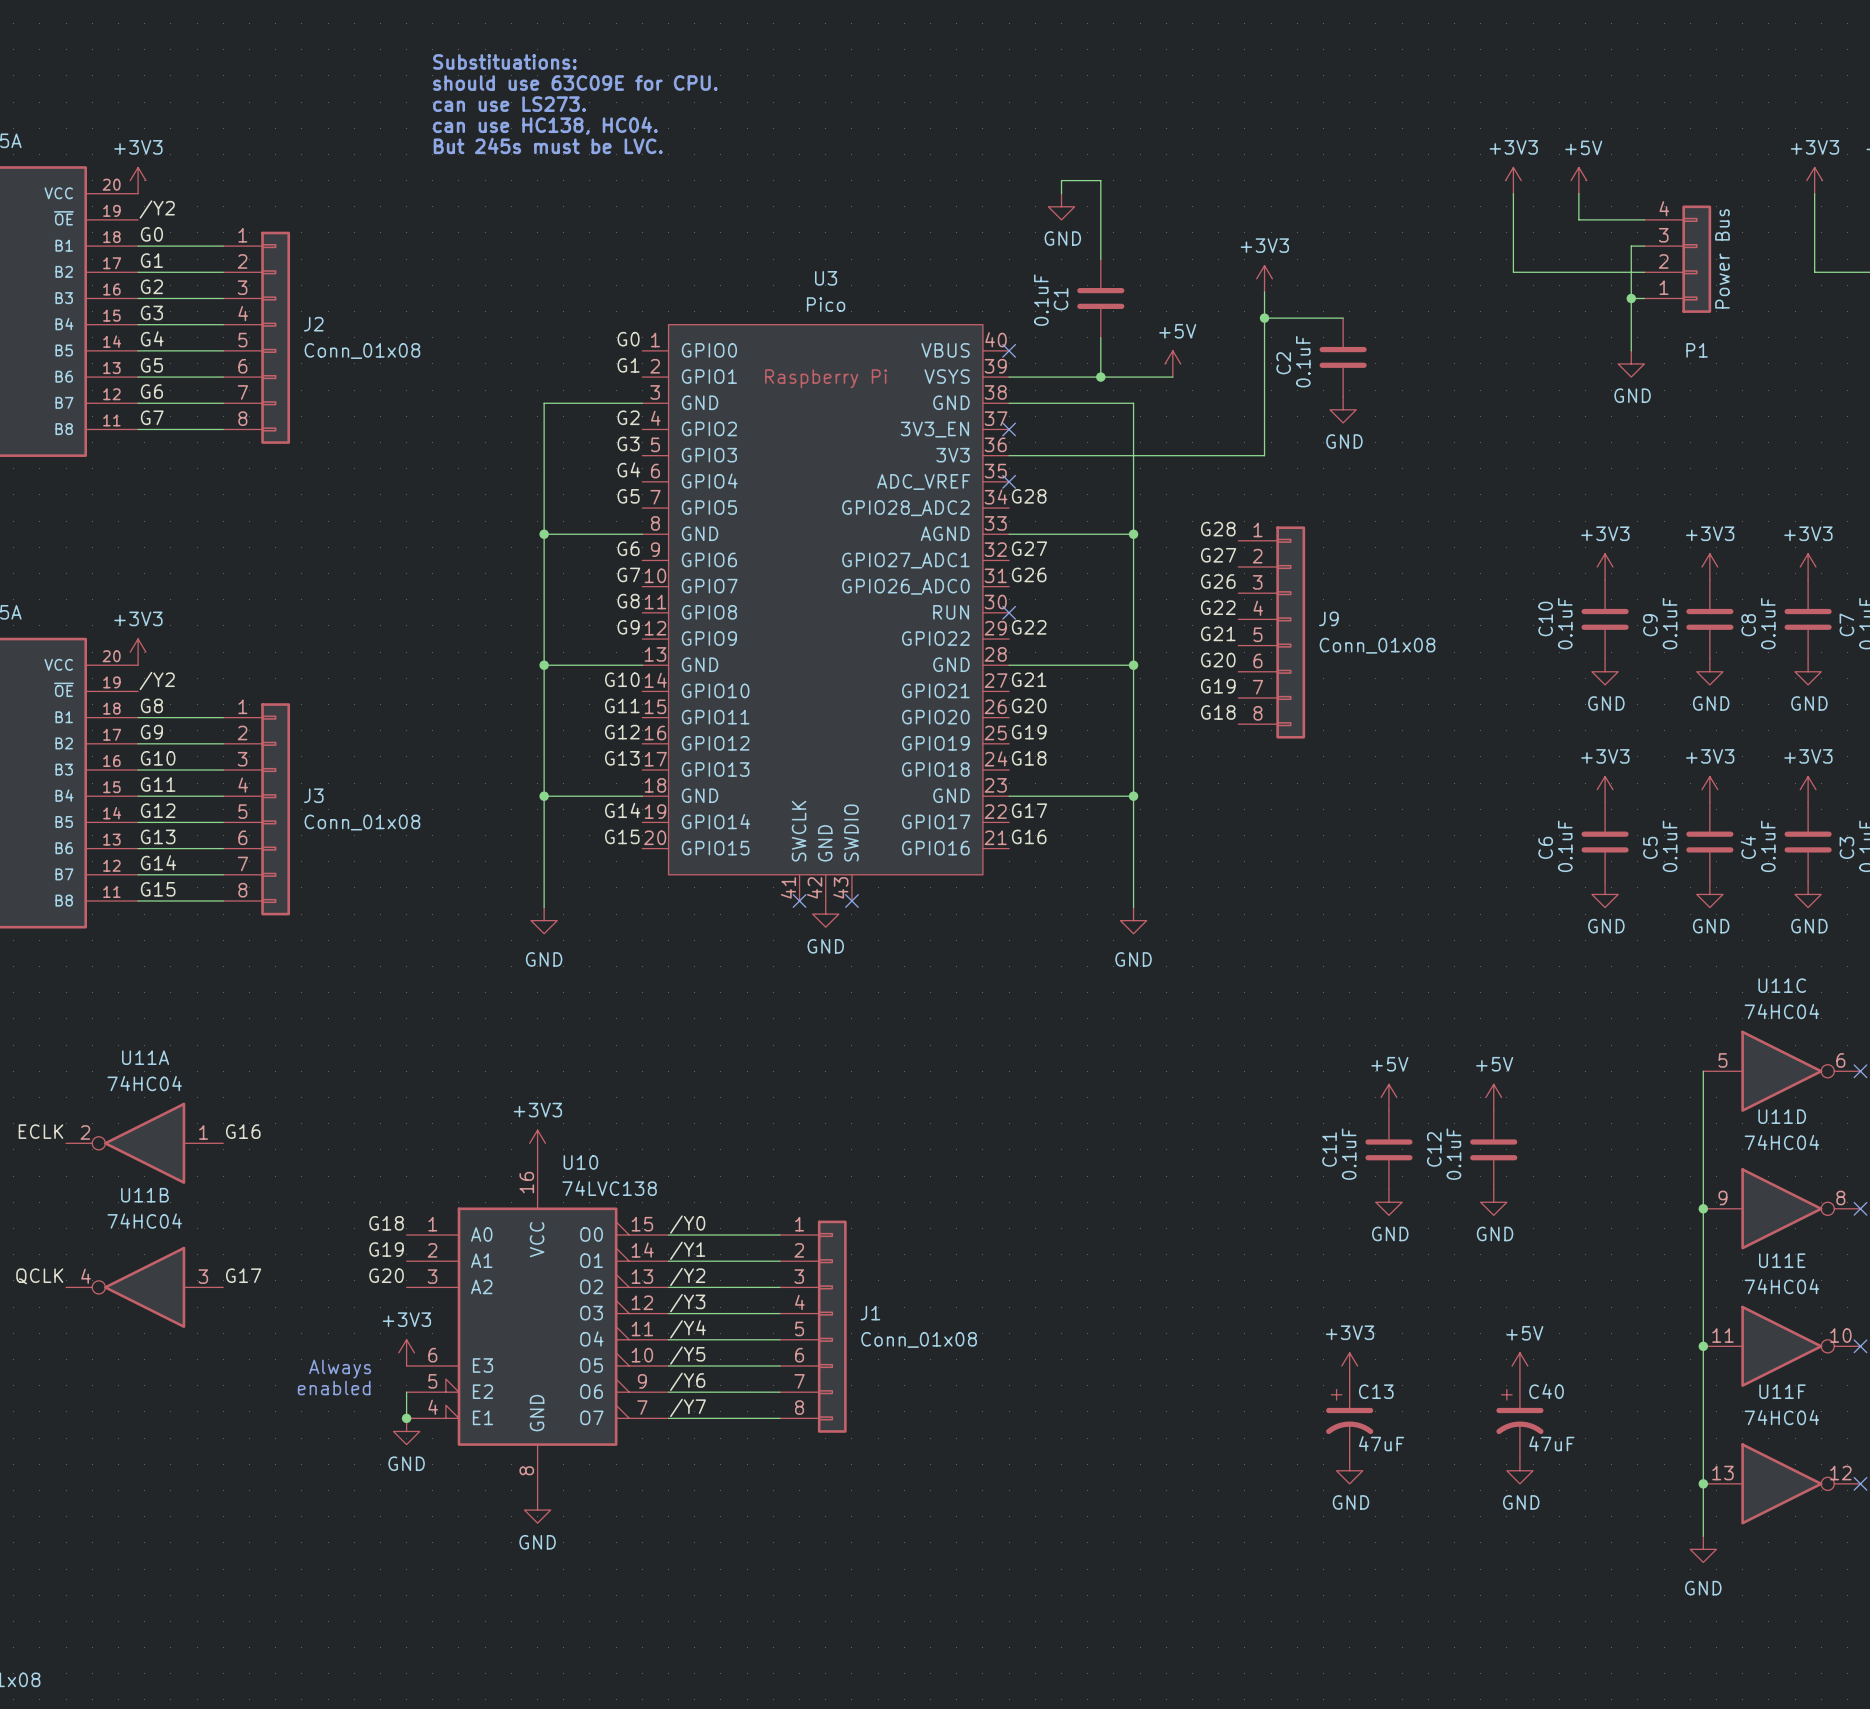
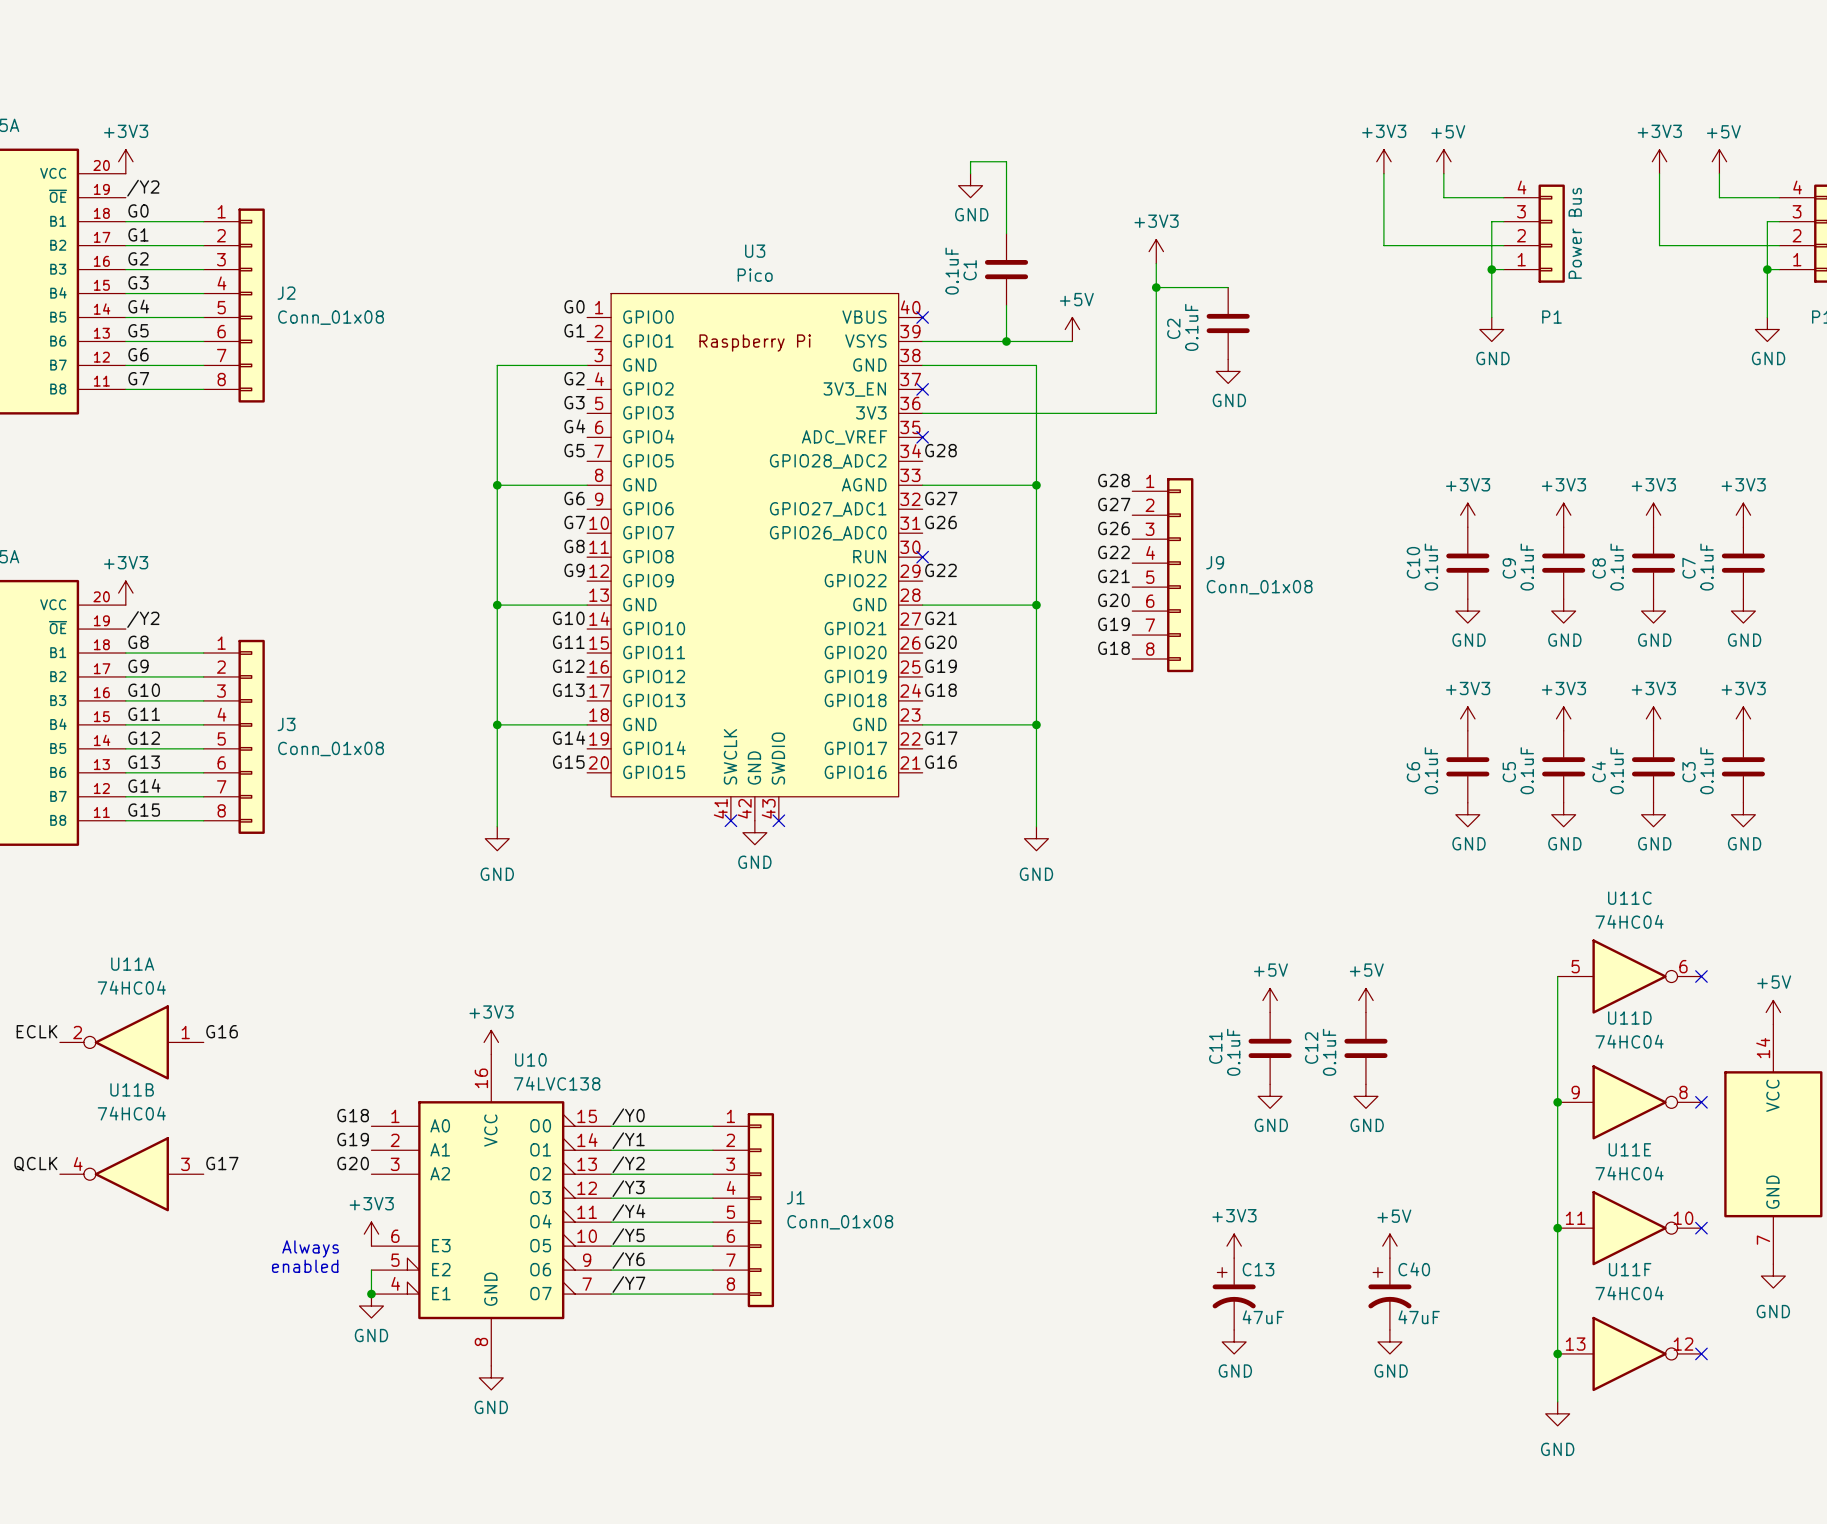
text: Substituations: (504, 61) -> none
text: should use 63C09E for CPU. (575, 83) -> none
text: can use LS273. (509, 104) -> none
text: can use HC138, HC04. (545, 125) -> none
text: But 245s must be LVC. (548, 145) -> none

